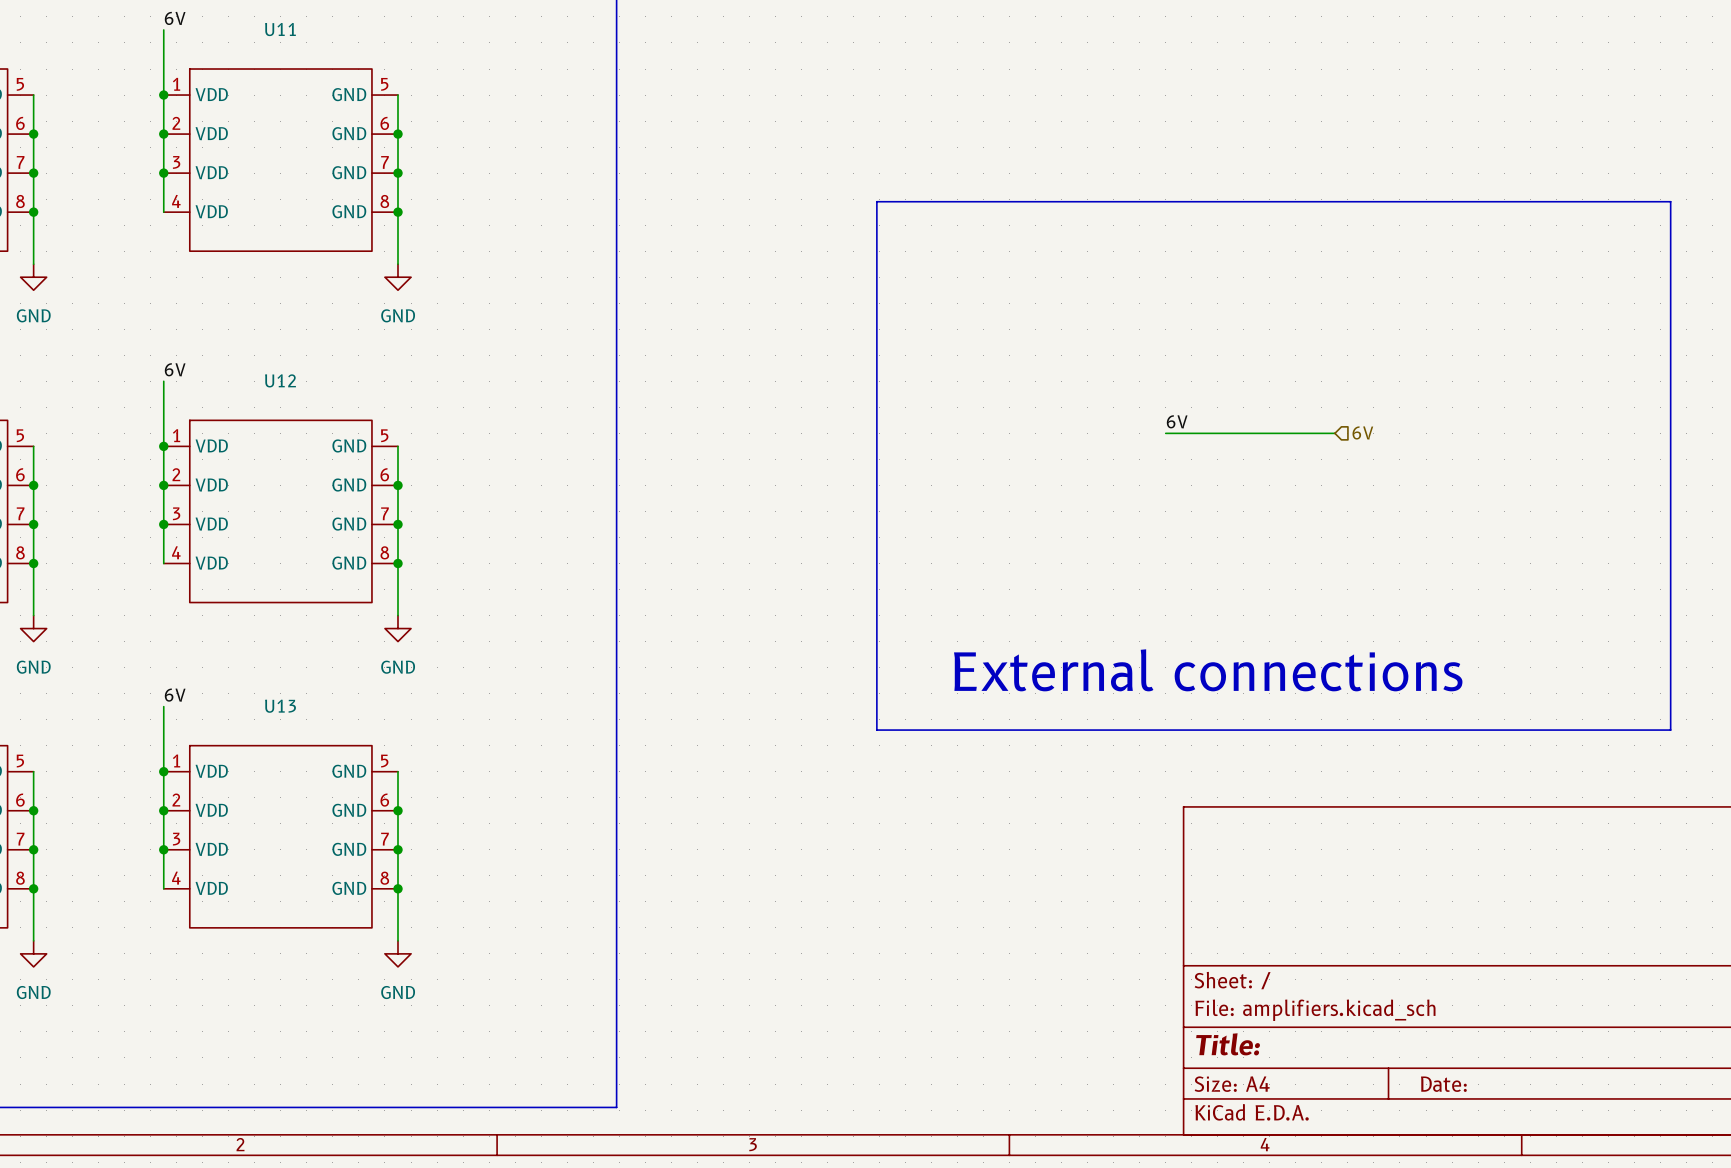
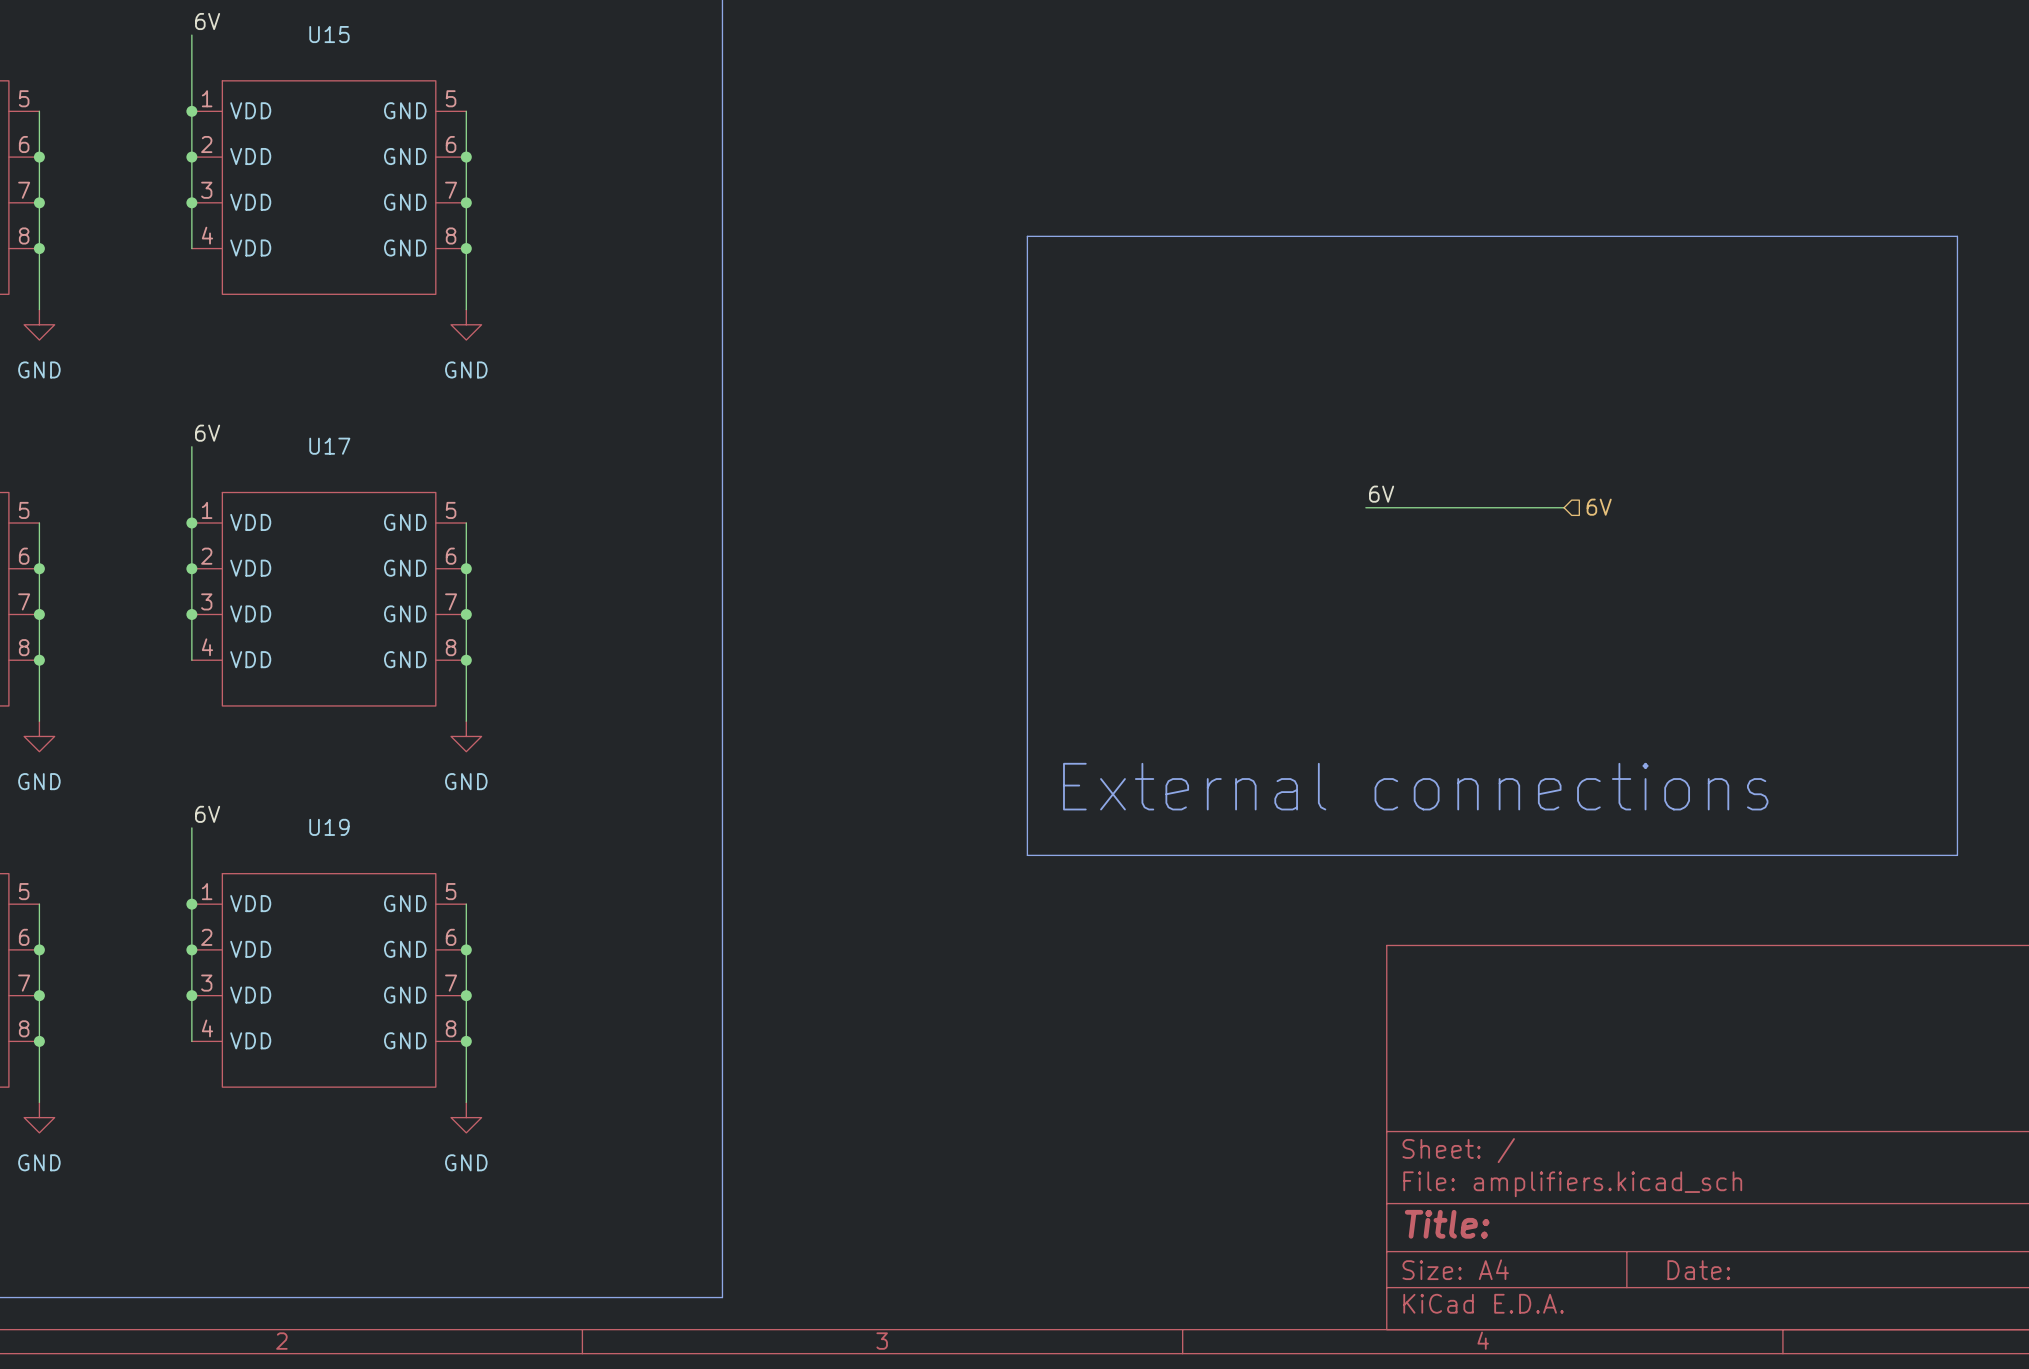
U11 name: U11 (280, 29) -> U15 (329, 34)
U12 name: U12 (280, 380) -> U17 (329, 446)
U13 name: U13 (280, 706) -> U19 (329, 827)

